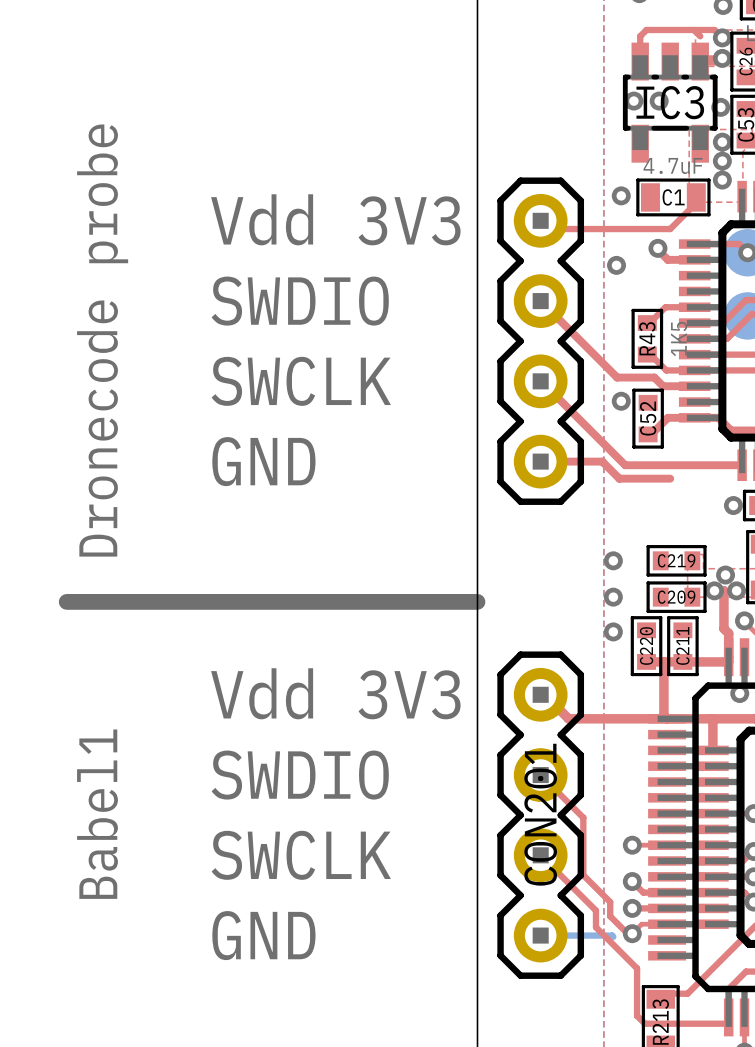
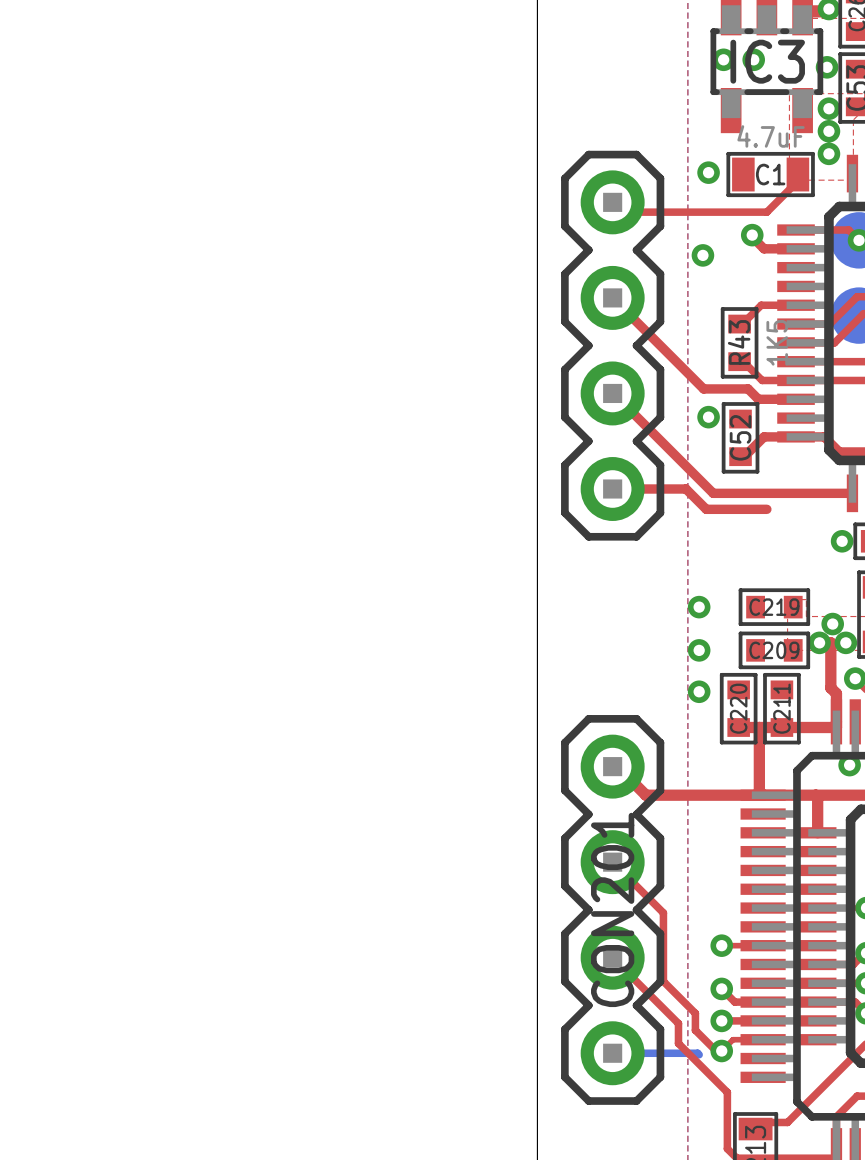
text: Vdd 3V3 (335, 219) -> none
text: SWDIO (300, 301) -> none
text: Dronecode probe (102, 340) -> none
text: SWCLK (301, 381) -> none
text: GND (263, 461) -> none
line: (66, 601) (477, 601) -> none
text: Vdd 3V3 (335, 693) -> none
text: SWDIO (300, 775) -> none
text: Babel1 (97, 814) -> none
text: SWCLK (301, 855) -> none
text: GND (263, 935) -> none

